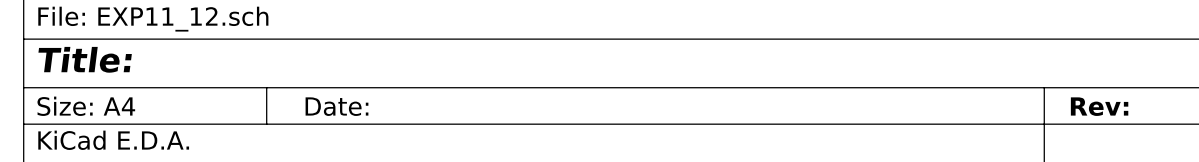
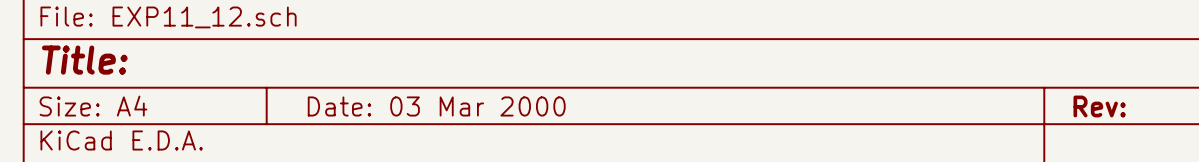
title block: Date: (336, 106) -> Date: 03 Mar 2000 (436, 106)

